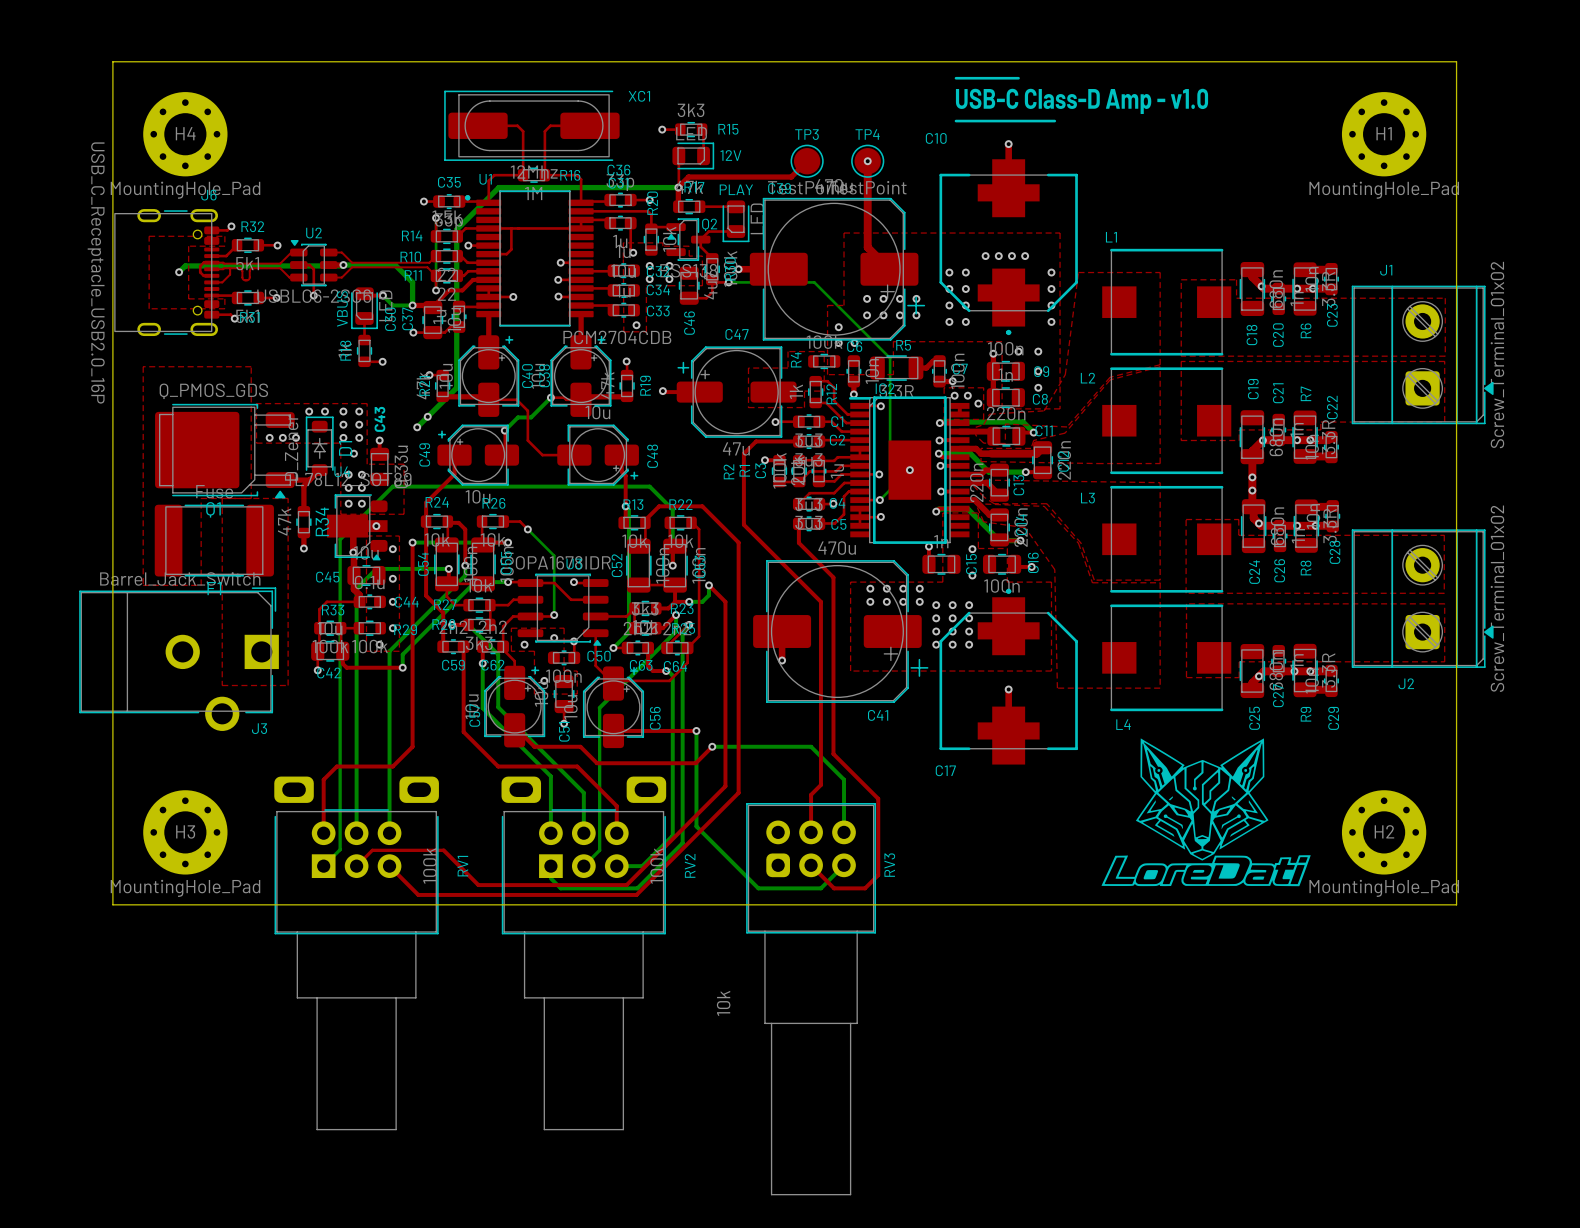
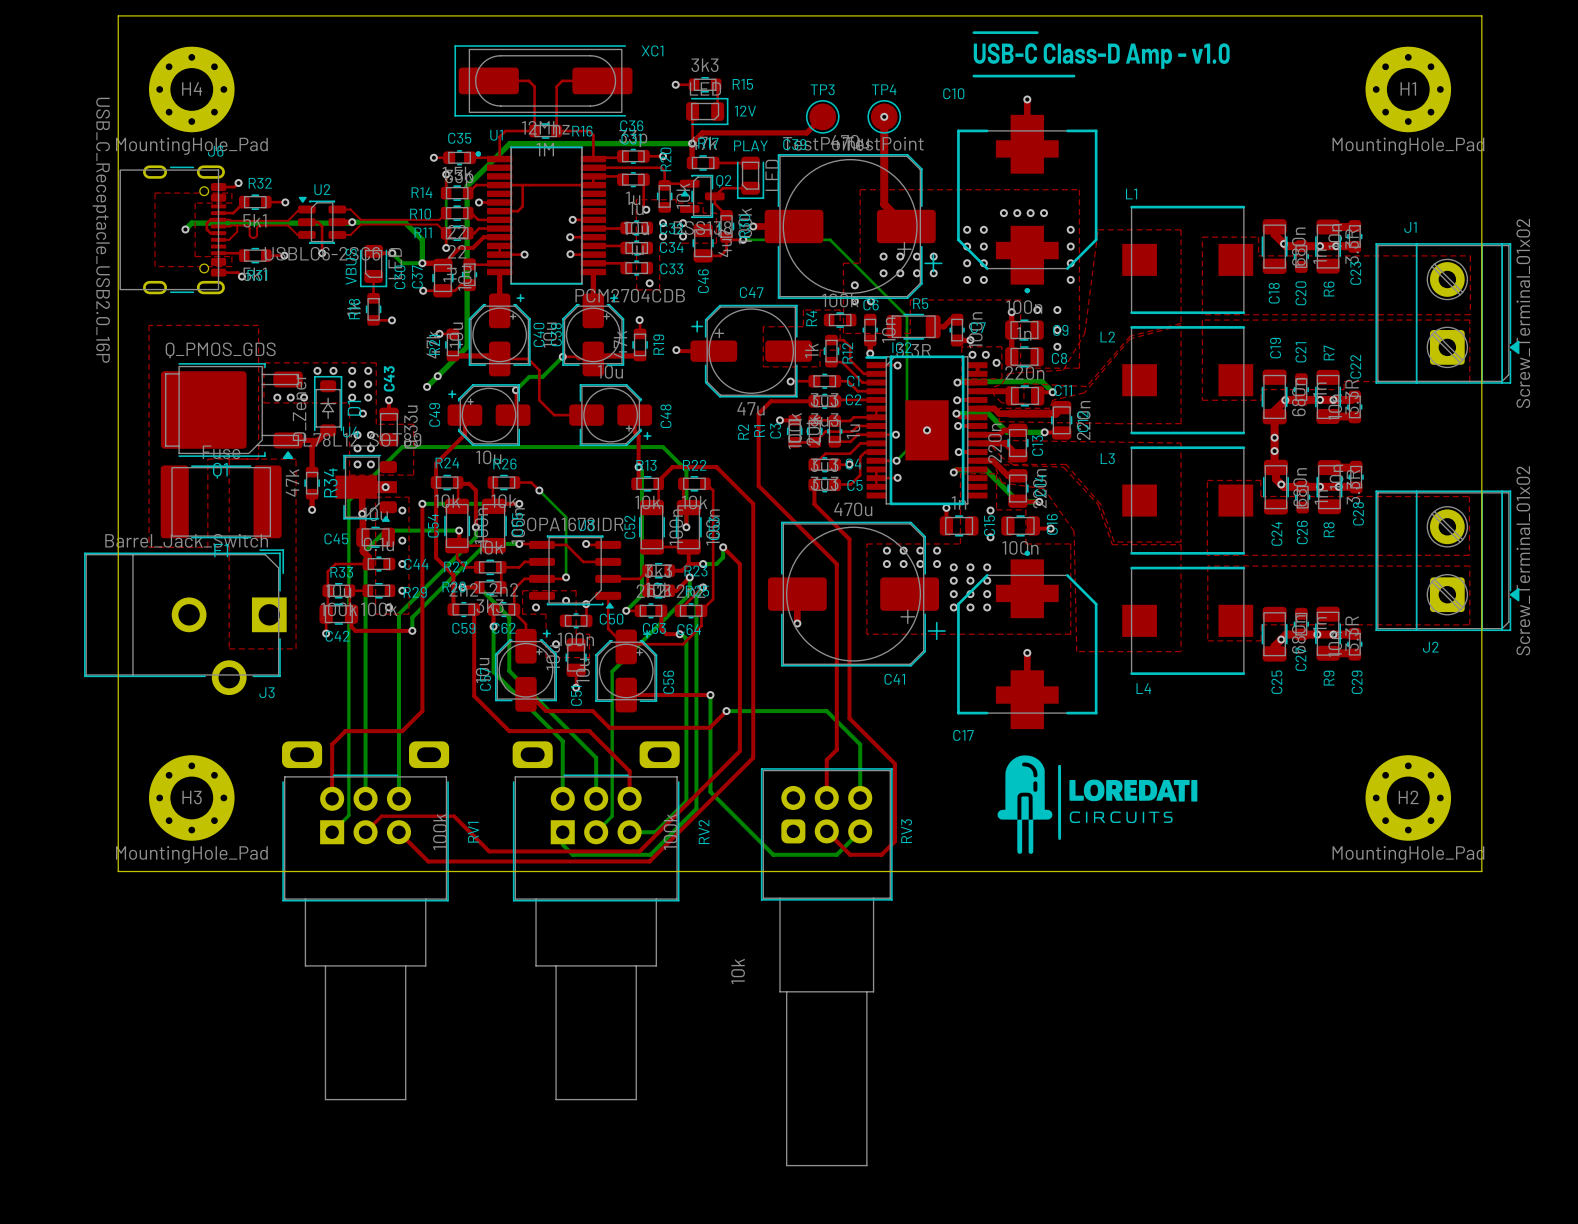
drawing: [1101, 738, 1311, 887] -> none
drawing: none -> [997, 755, 1190, 854]
drawing shape: [1163, 814, 1183, 829] -> [1191, 779, 1198, 802]

